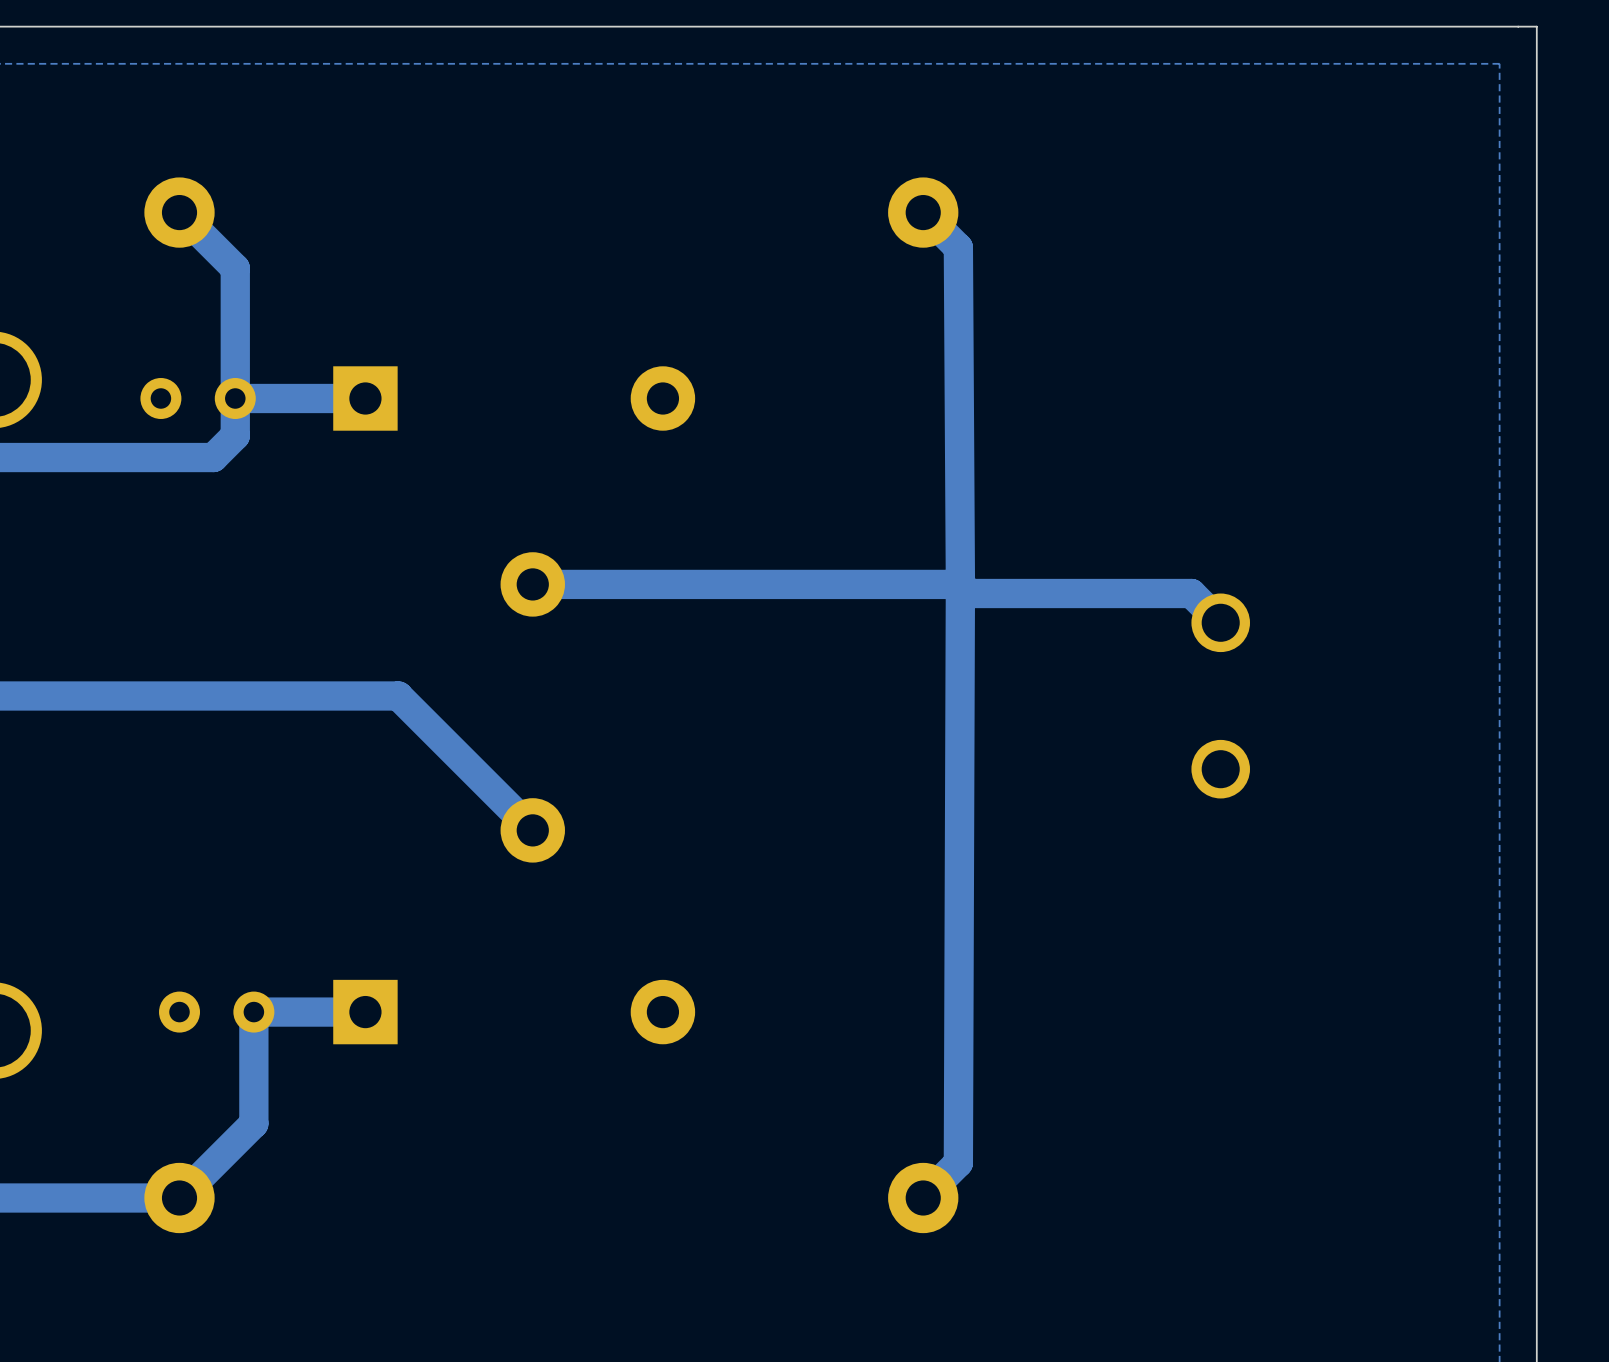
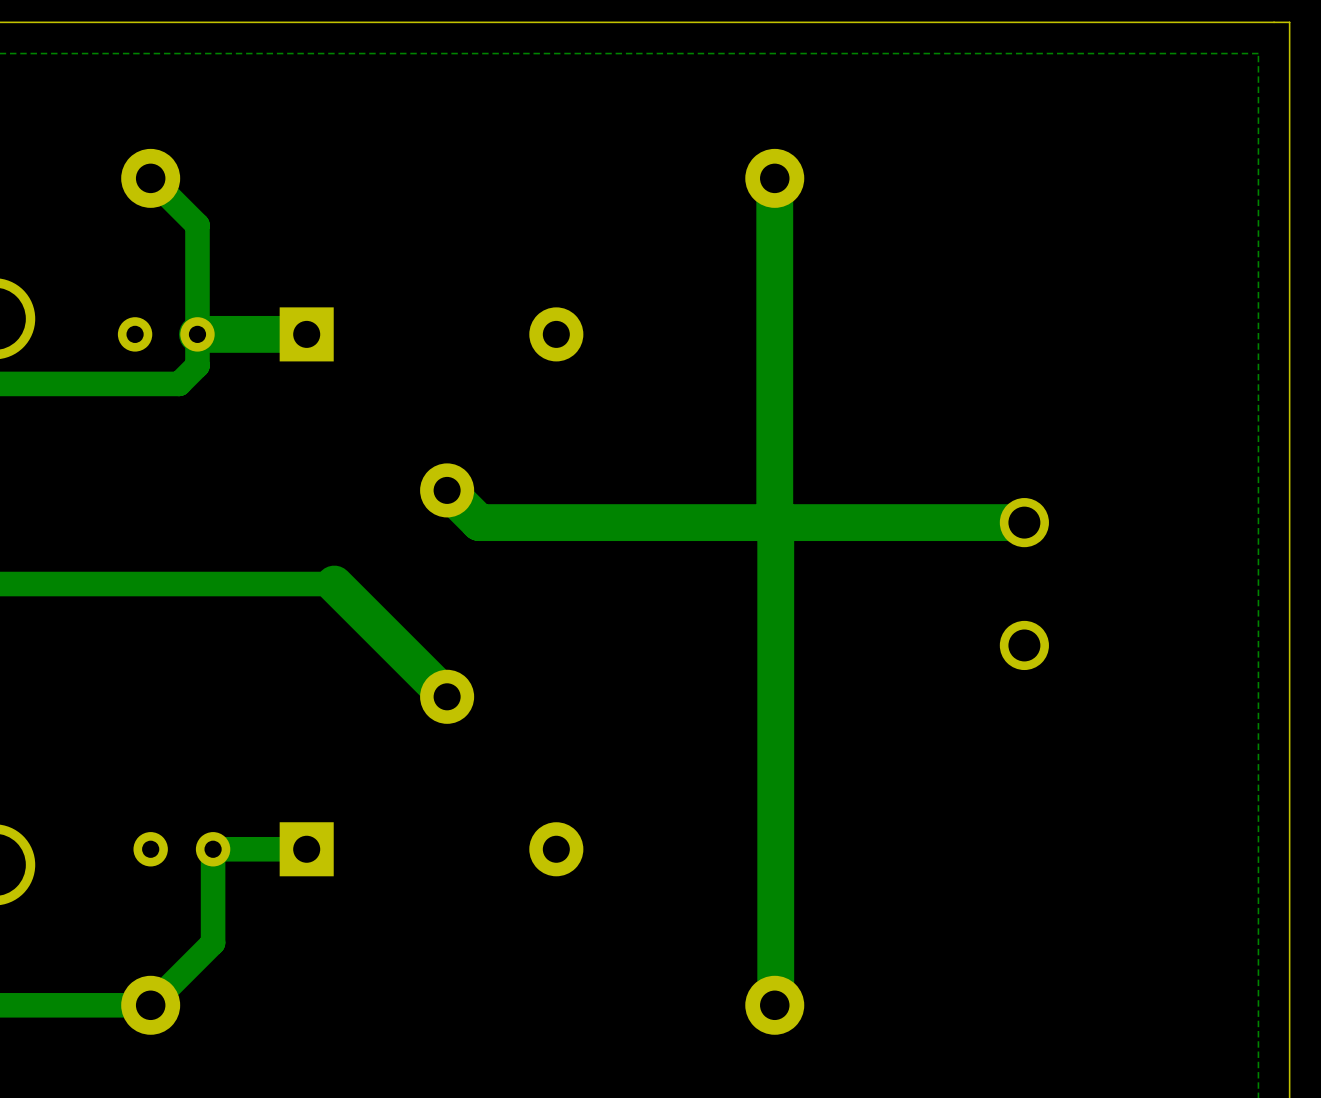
bottom track: (923, 212) (958, 247) (960, 584) -> (774, 178) (774, 1005)
bottom track width: thin (365, 398) (235, 398) -> thick (306, 334) (197, 334)
bottom track: (960, 584) (532, 584) -> (1024, 522) (479, 522) (447, 490)
bottom track: (960, 584) (958, 1162) (924, 1196) -> none
bottom track: (960, 584) (969, 593) (1191, 593) (1220, 622) -> none
bottom track width: thin (398, 695) (532, 830) -> thick (334, 584) (447, 696)

